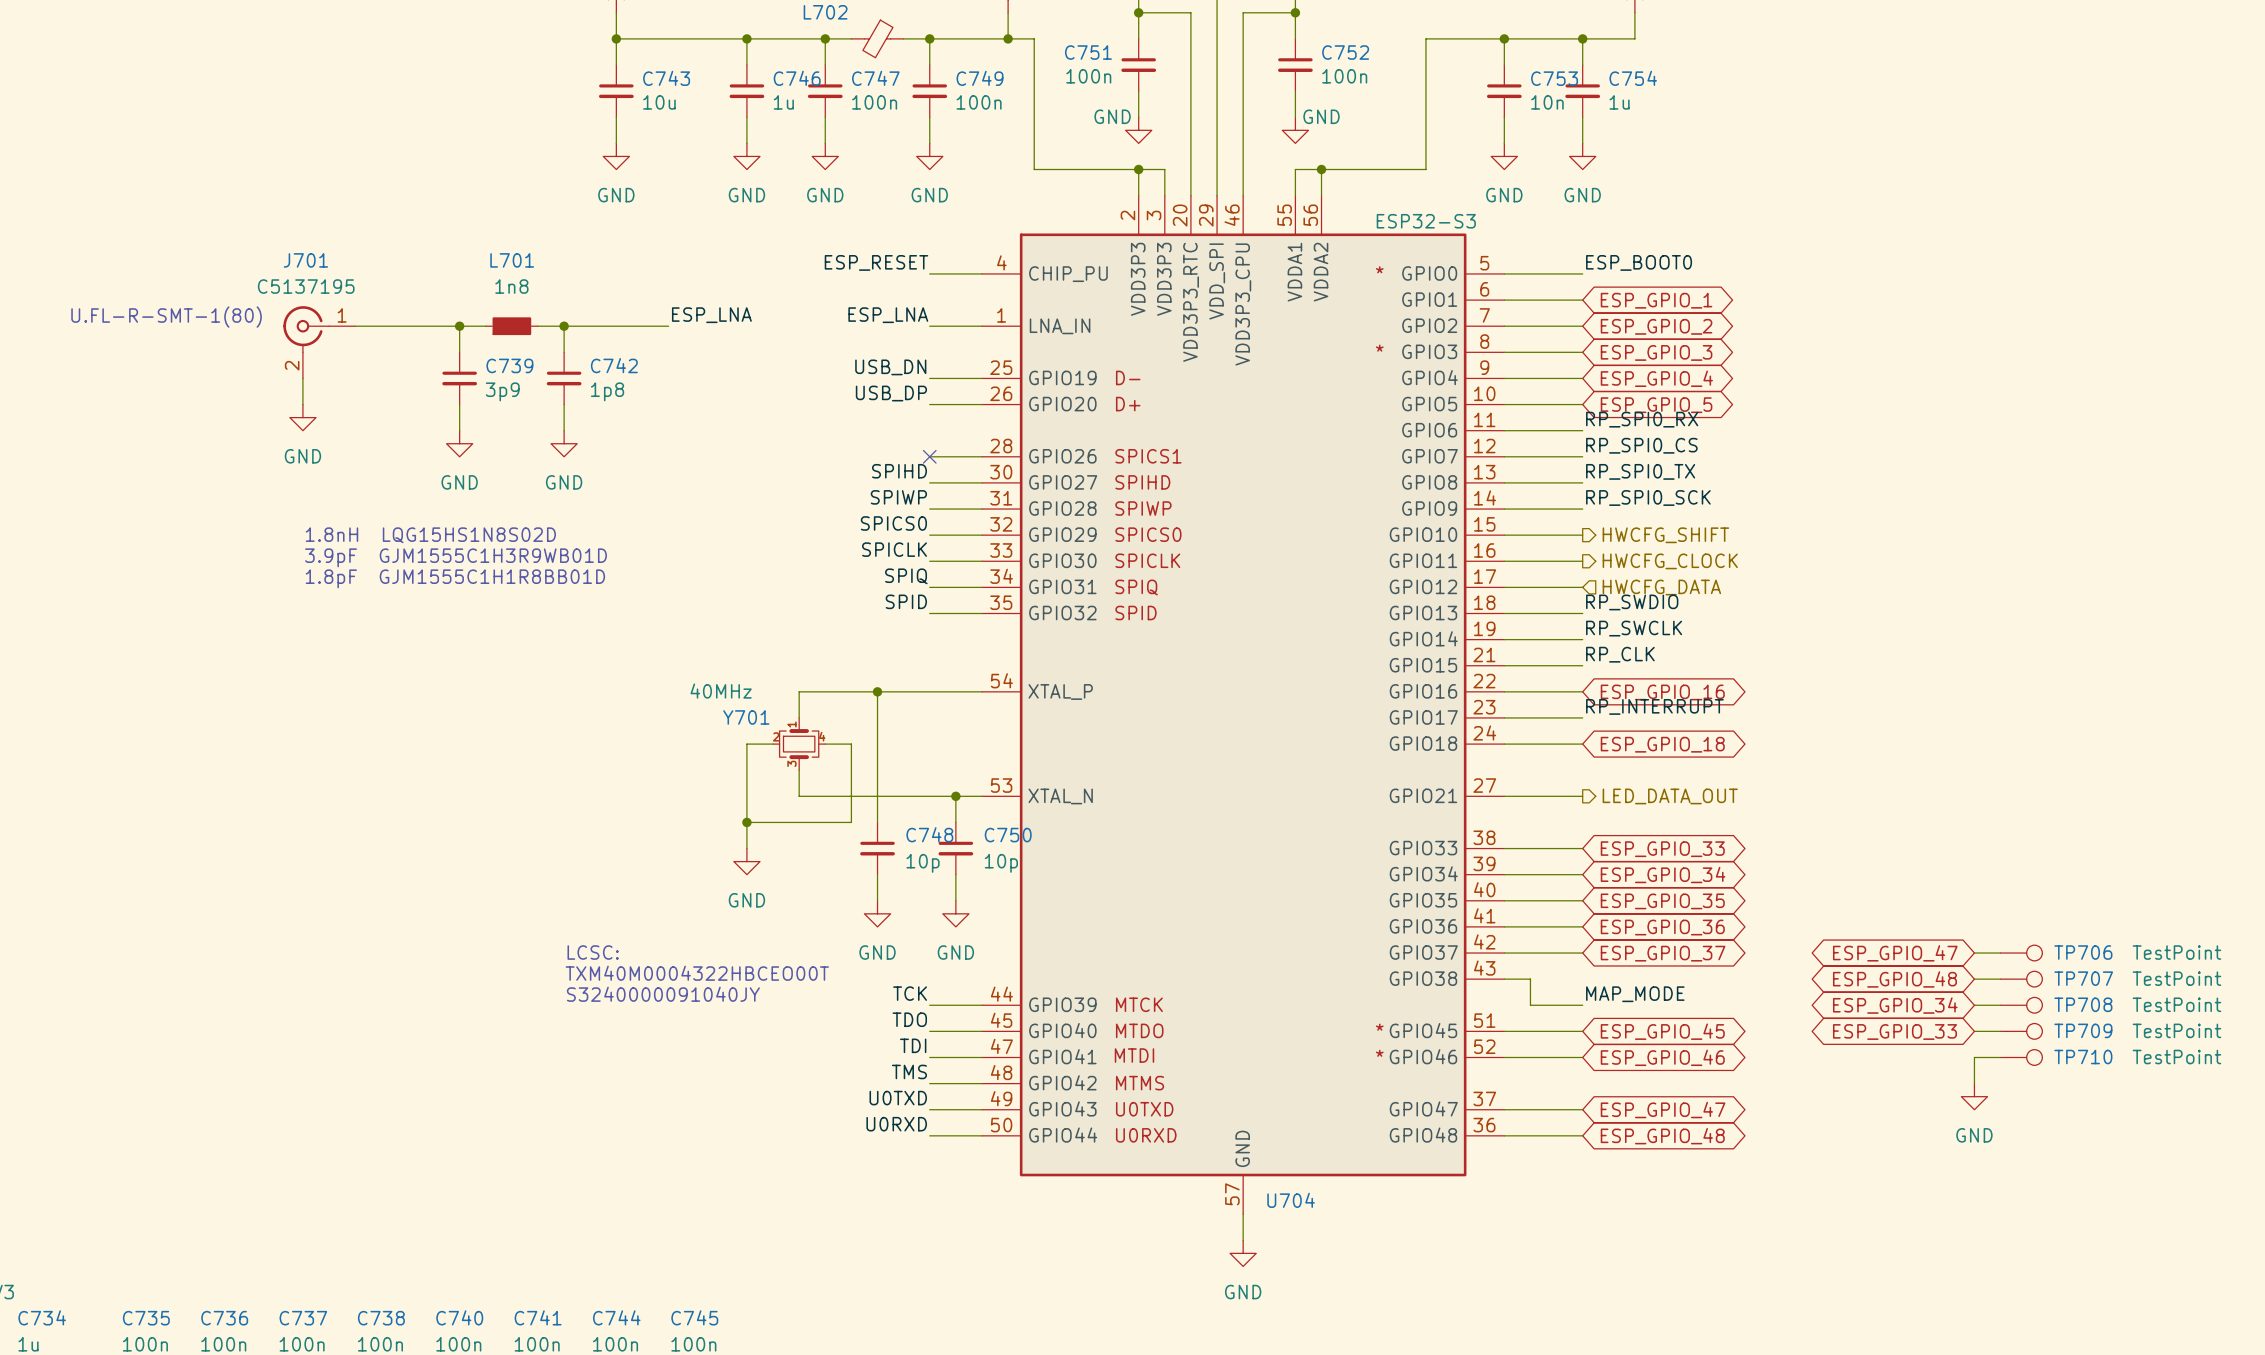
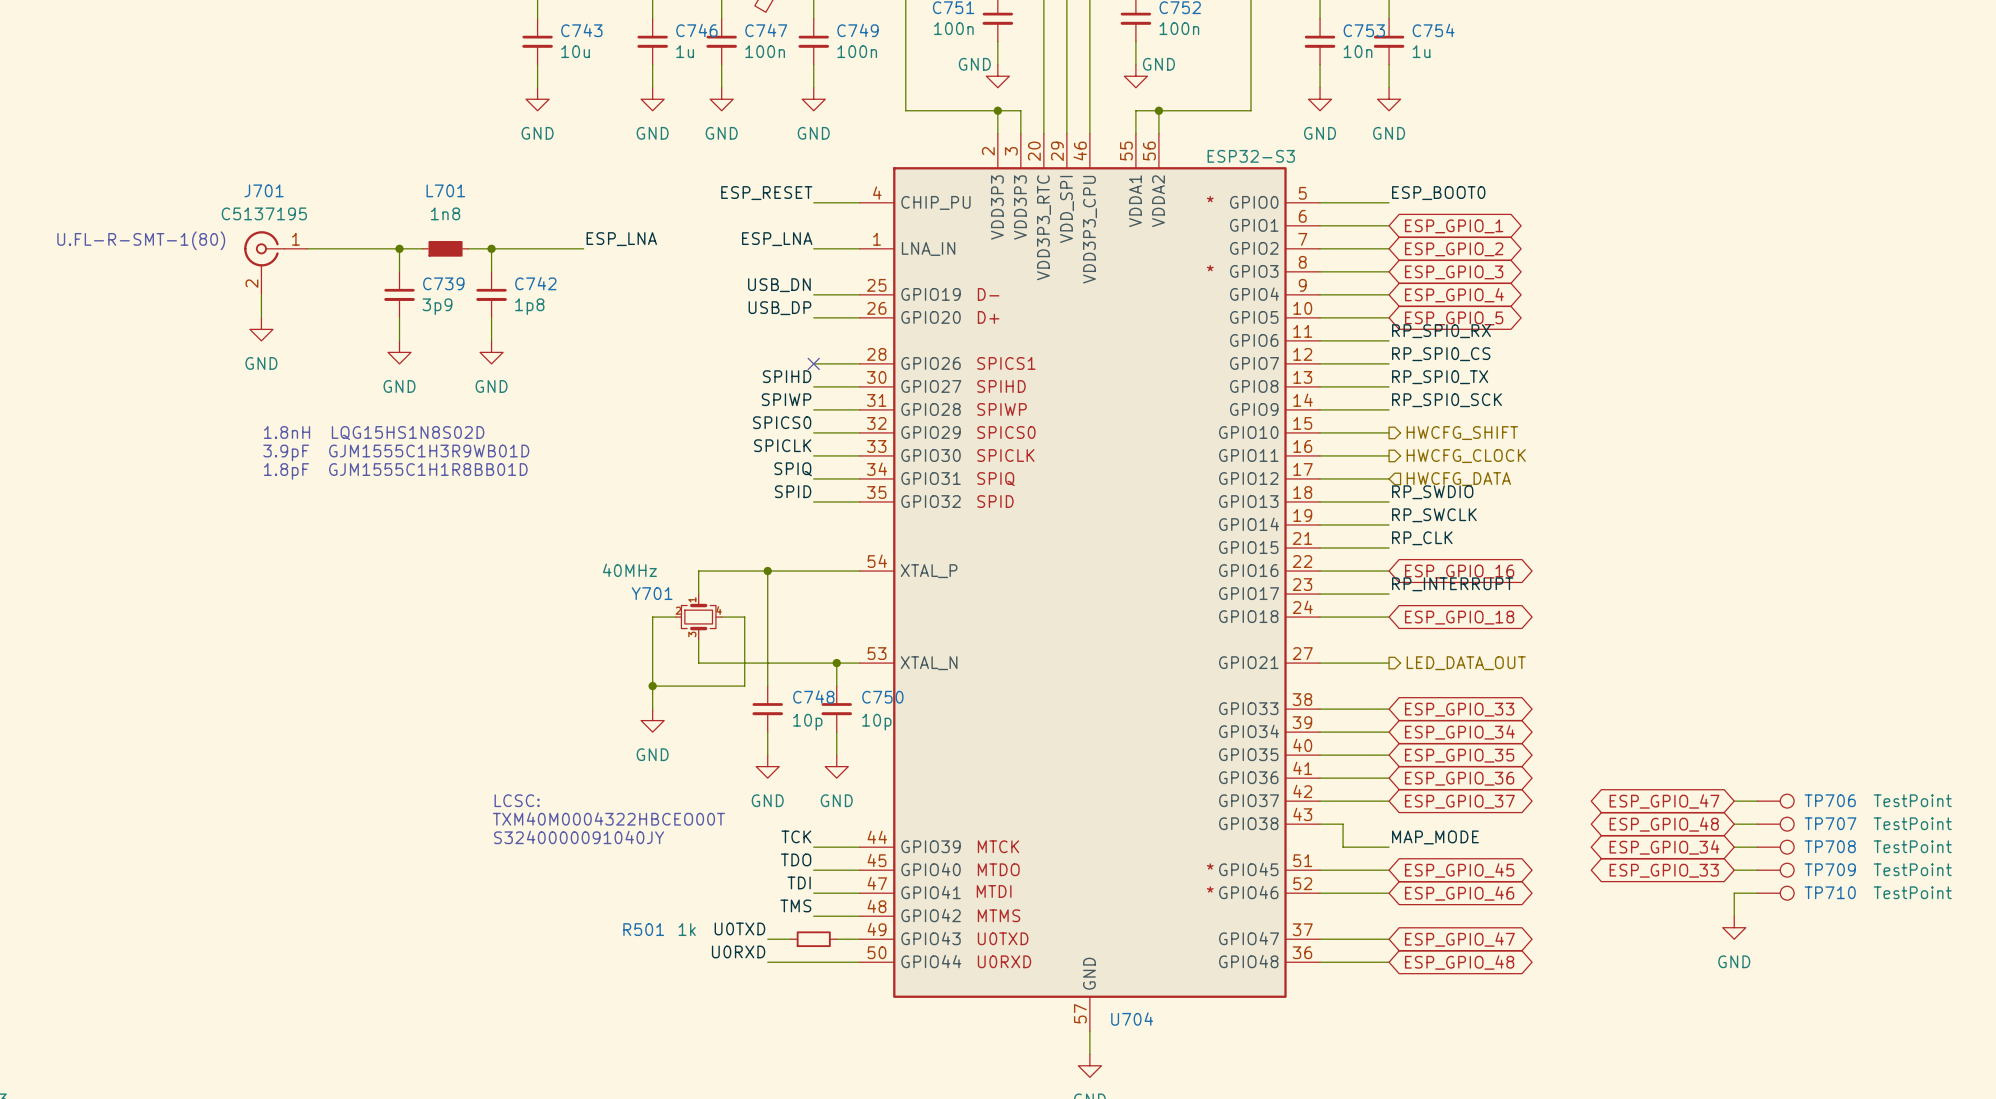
label position: U0TXD (898, 1098) -> U0TXD (739, 928)
wire: (929, 1109) (955, 1109) -> (767, 939) (790, 939)
R501: none -> 1k (813, 939)
label position: U0RXD (896, 1124) -> U0RXD (738, 951)
wire: none -> (767, 962) (813, 962)

